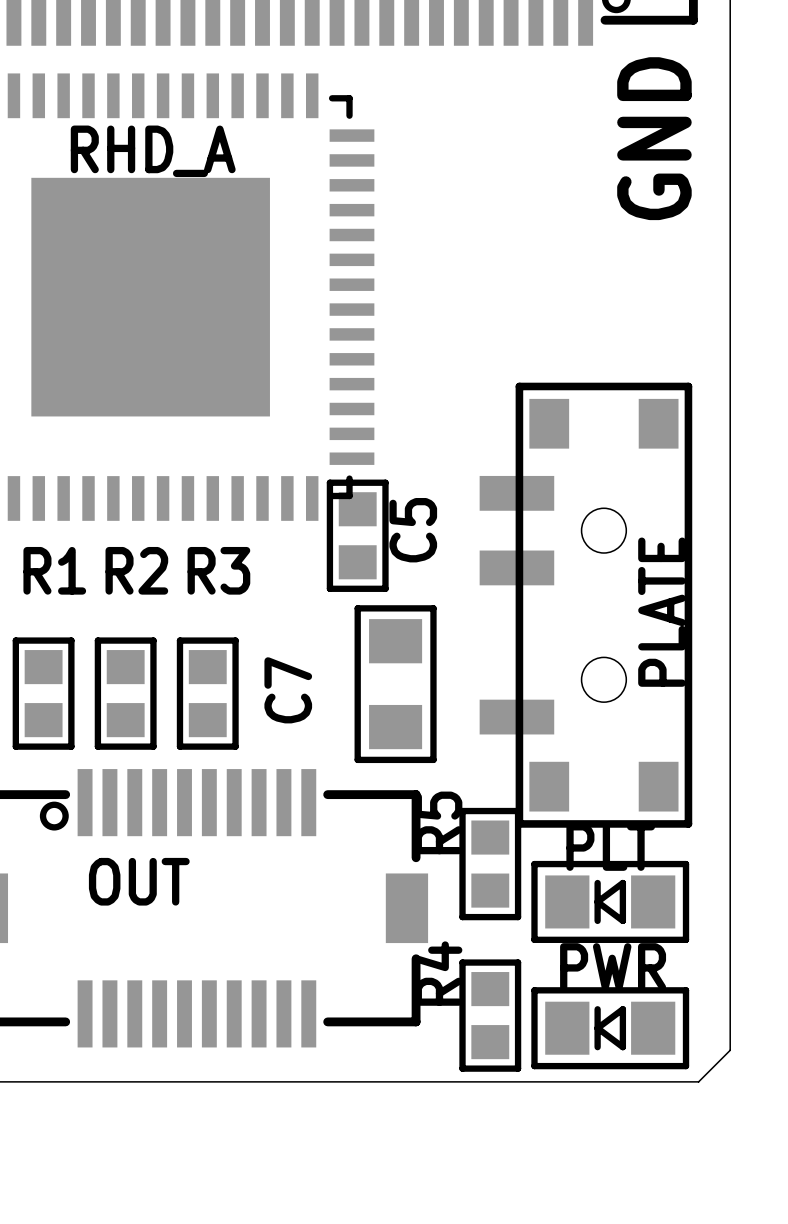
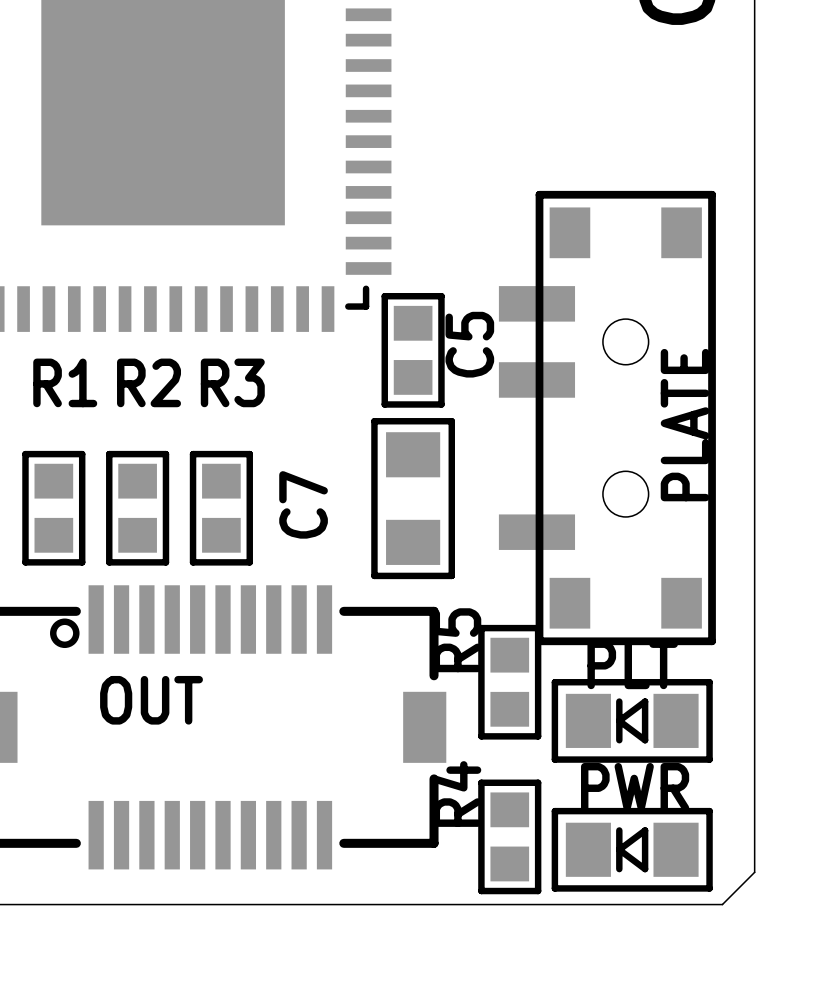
C5 position: (357, 535) -> (413, 350)

